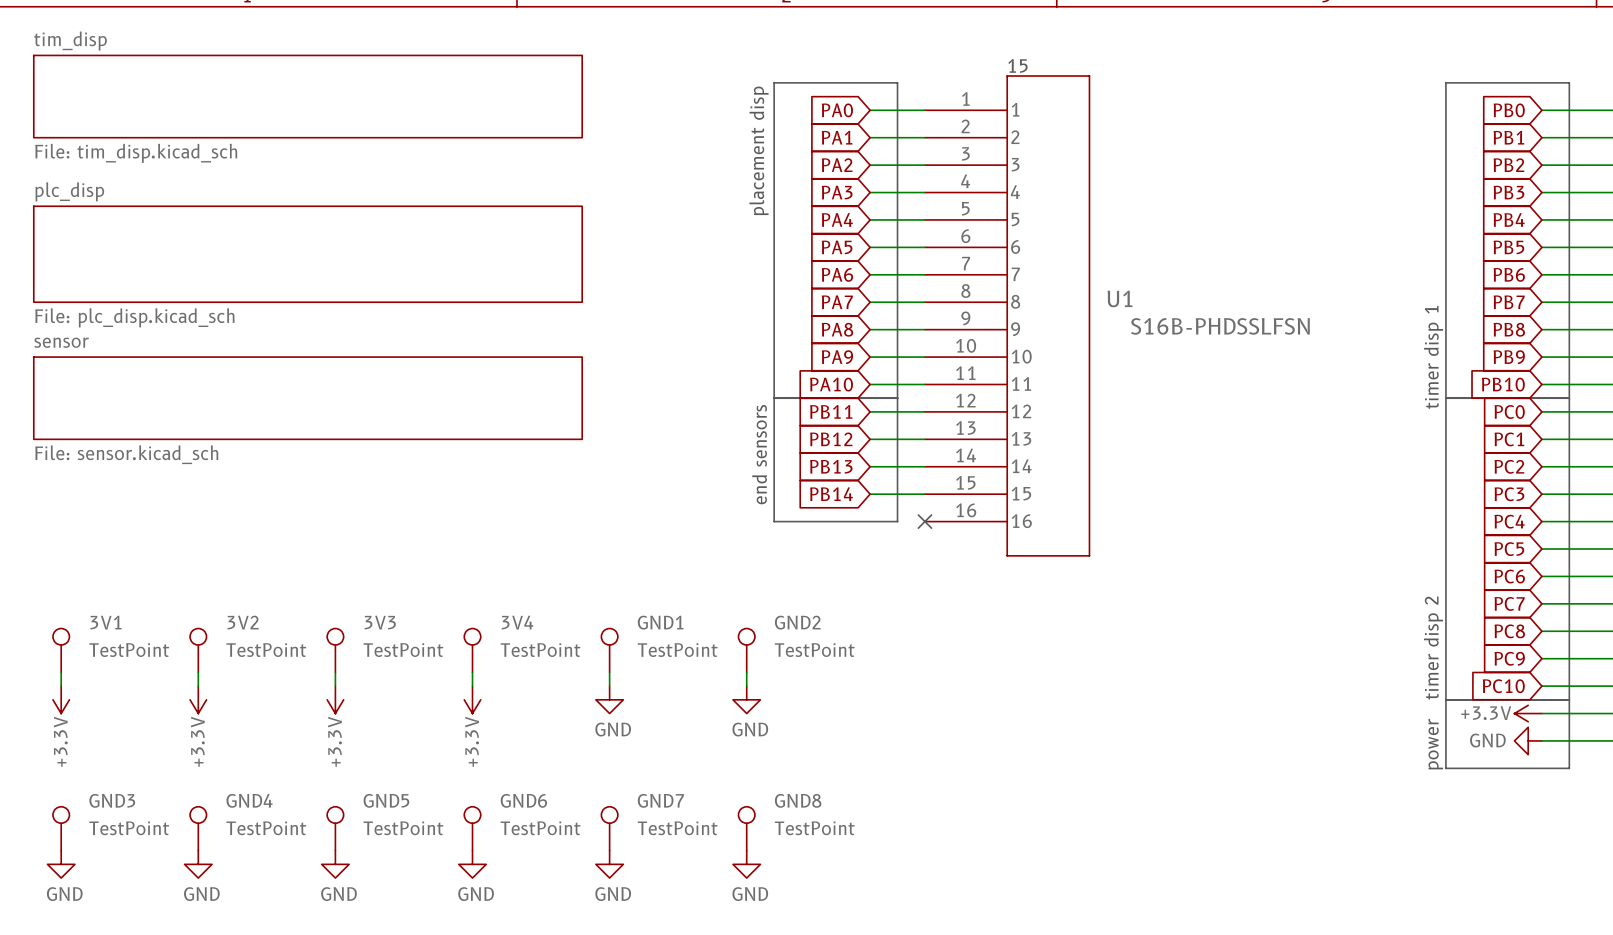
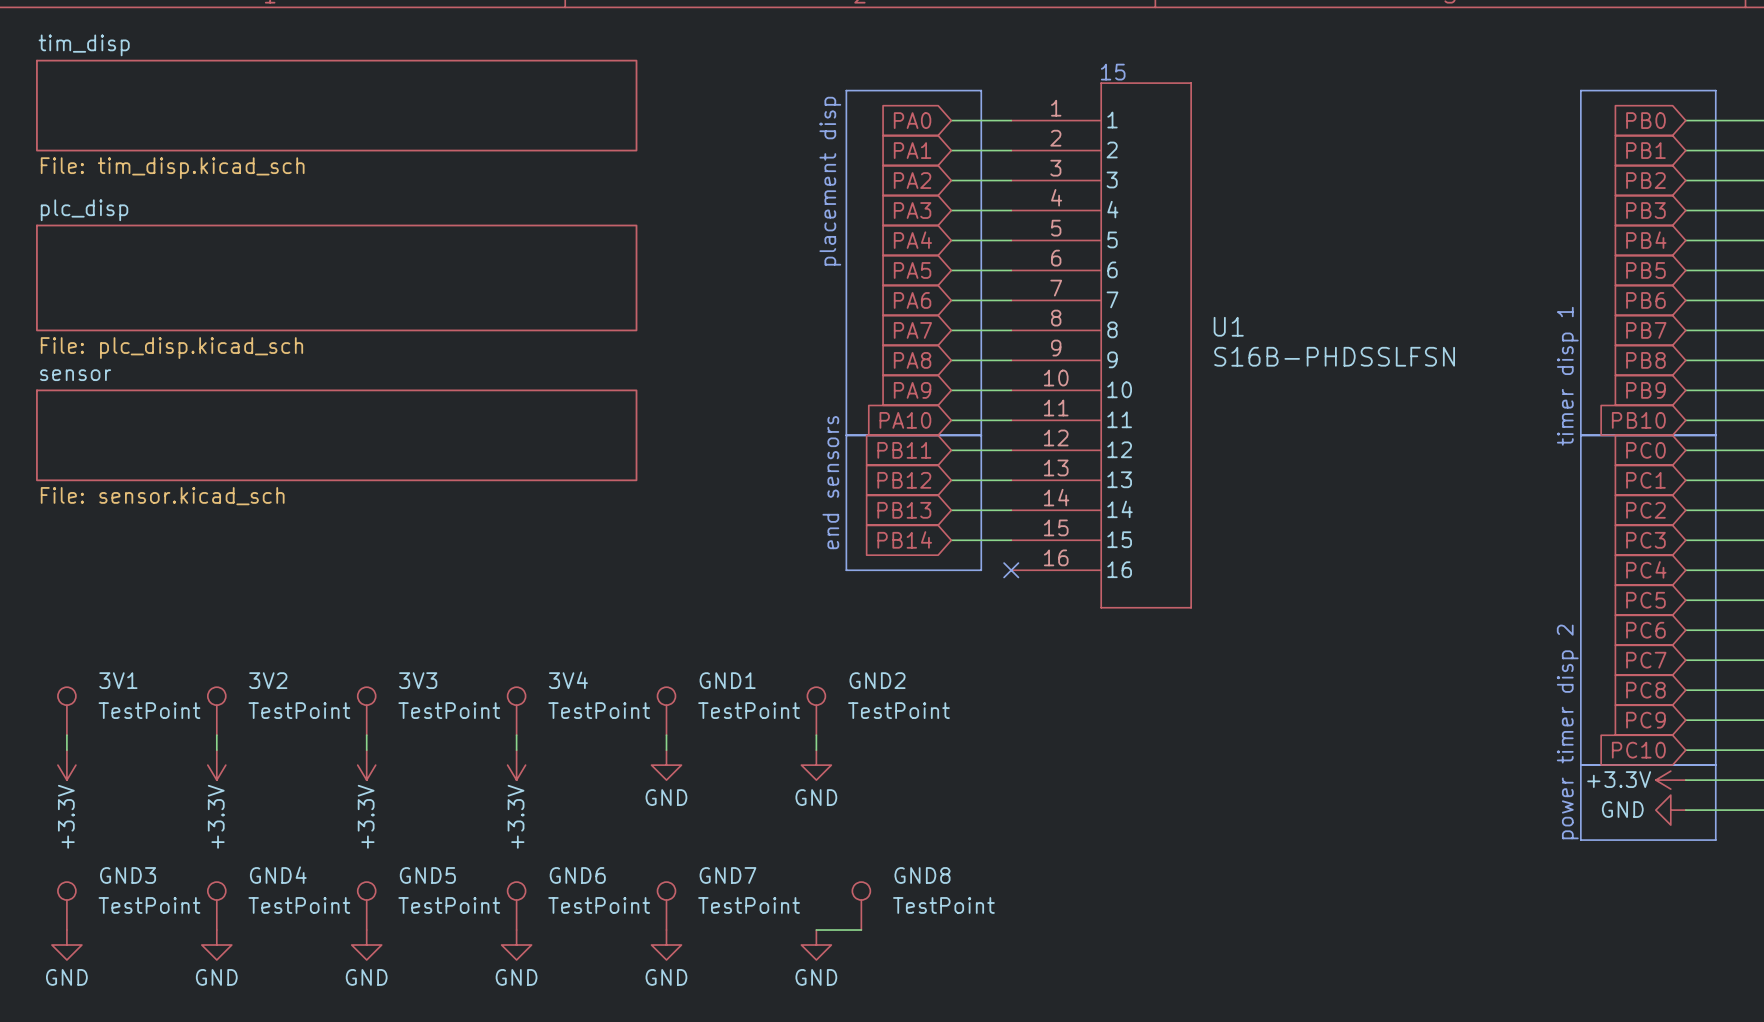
GND8 position: (746, 828) -> (861, 906)
wire: none -> (816, 930) (861, 930)

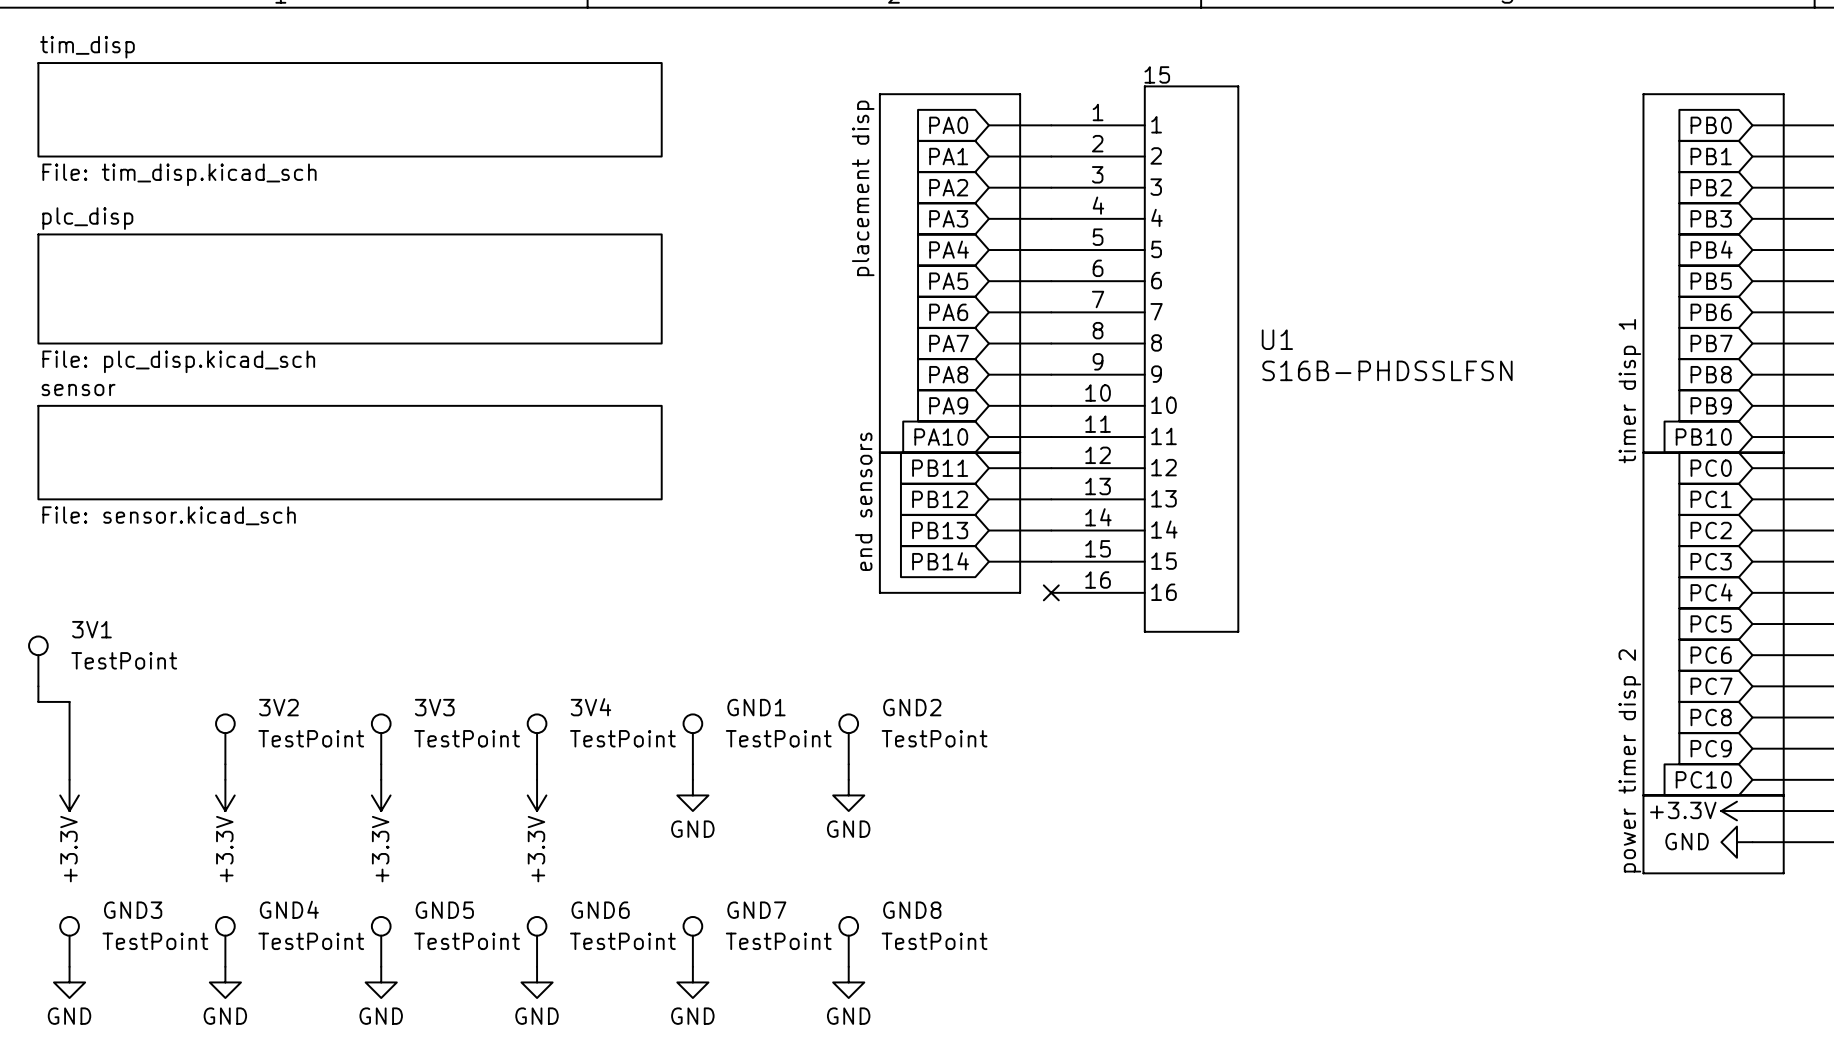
wire: none -> (38, 686) (38, 701) (69, 701) (69, 764)
3V1 position: (66, 711) -> (38, 661)
GND8 position: (861, 906) -> (848, 941)
wire: (816, 930) (861, 930) -> none

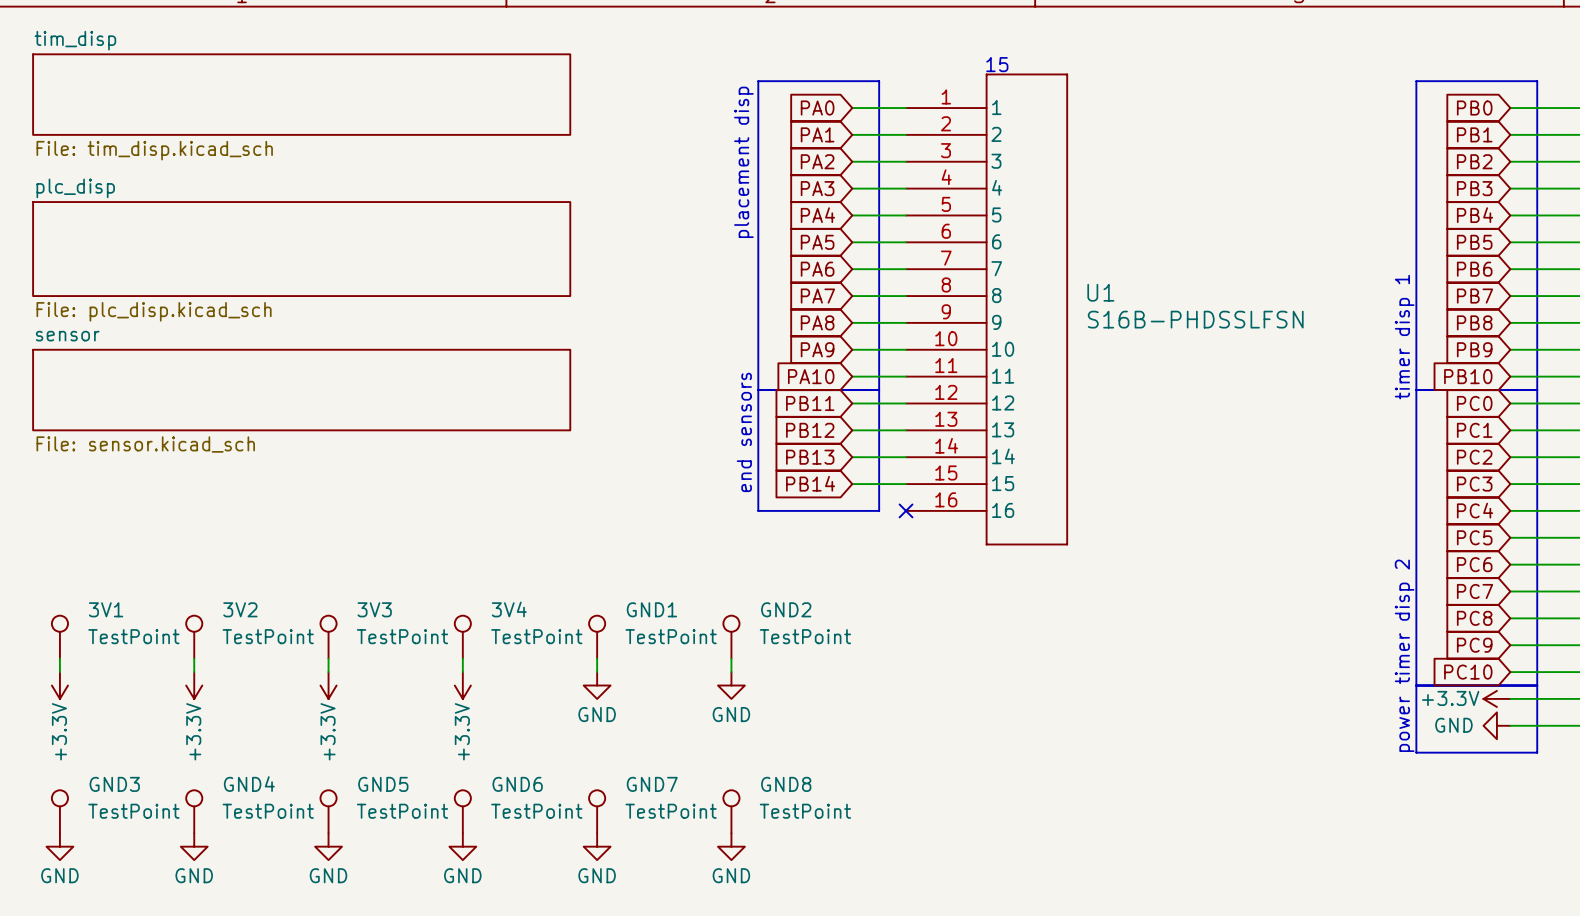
3V1 position: (38, 661) -> (59, 637)
wire: (38, 686) (38, 701) (69, 701) (69, 764) -> none

